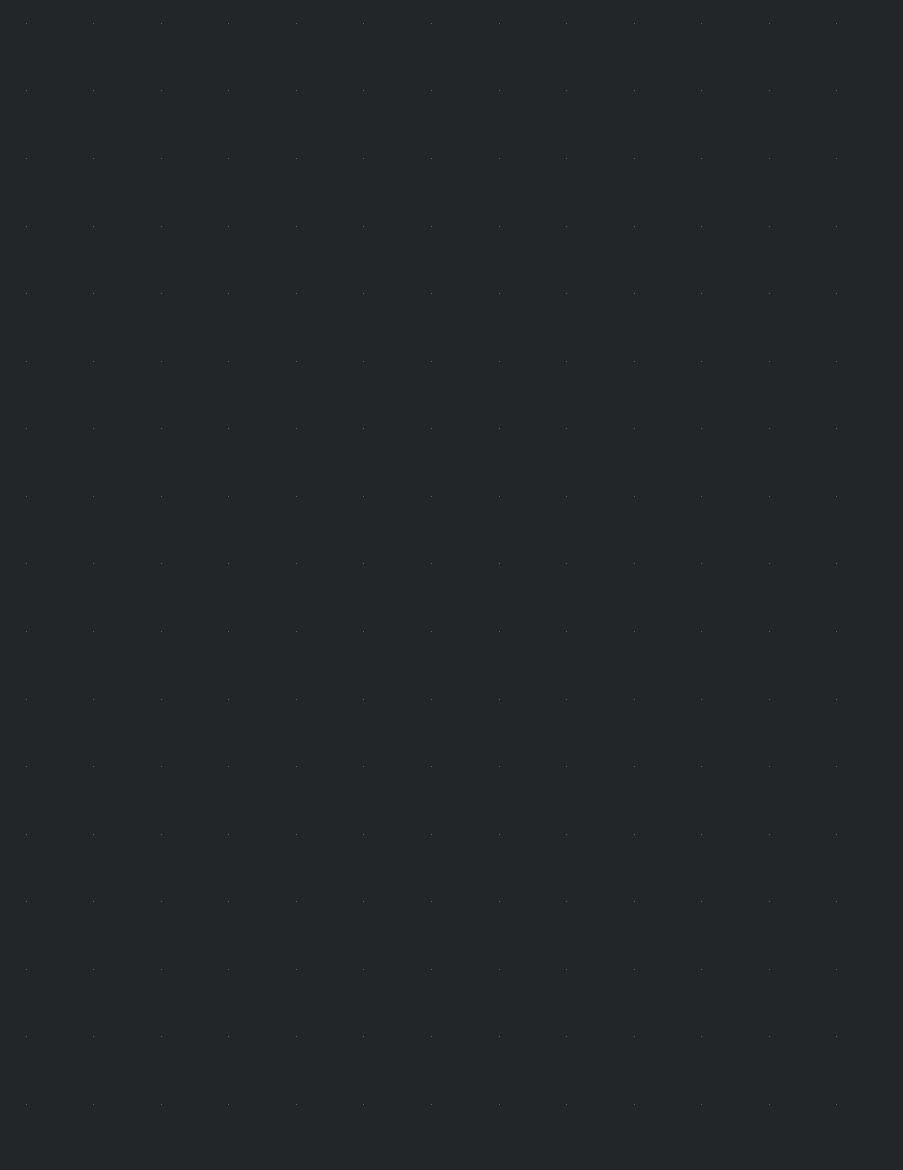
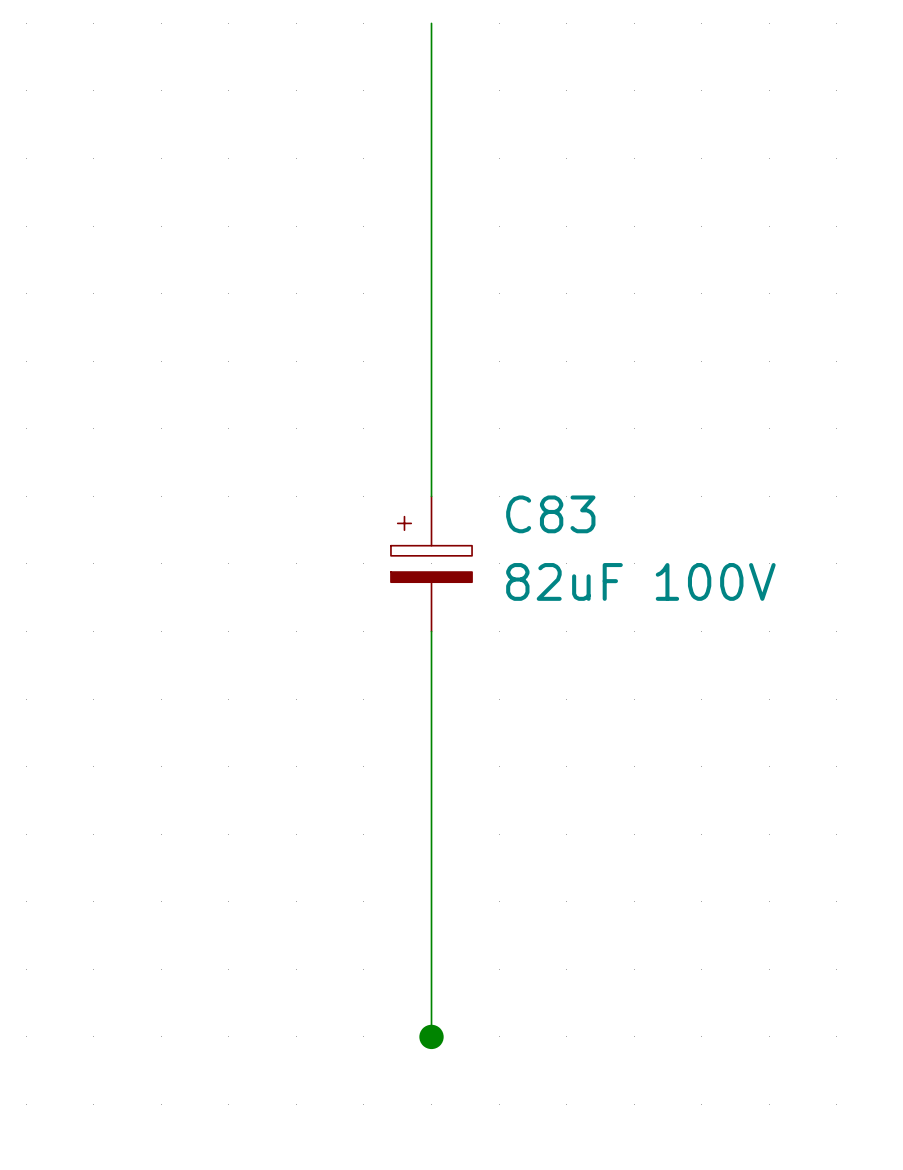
wire: none -> (431, 23) (431, 496)
C83: none -> 82uF 100V (431, 563)
wire: none -> (431, 631) (431, 1036)
junction: none -> (431, 1036)

